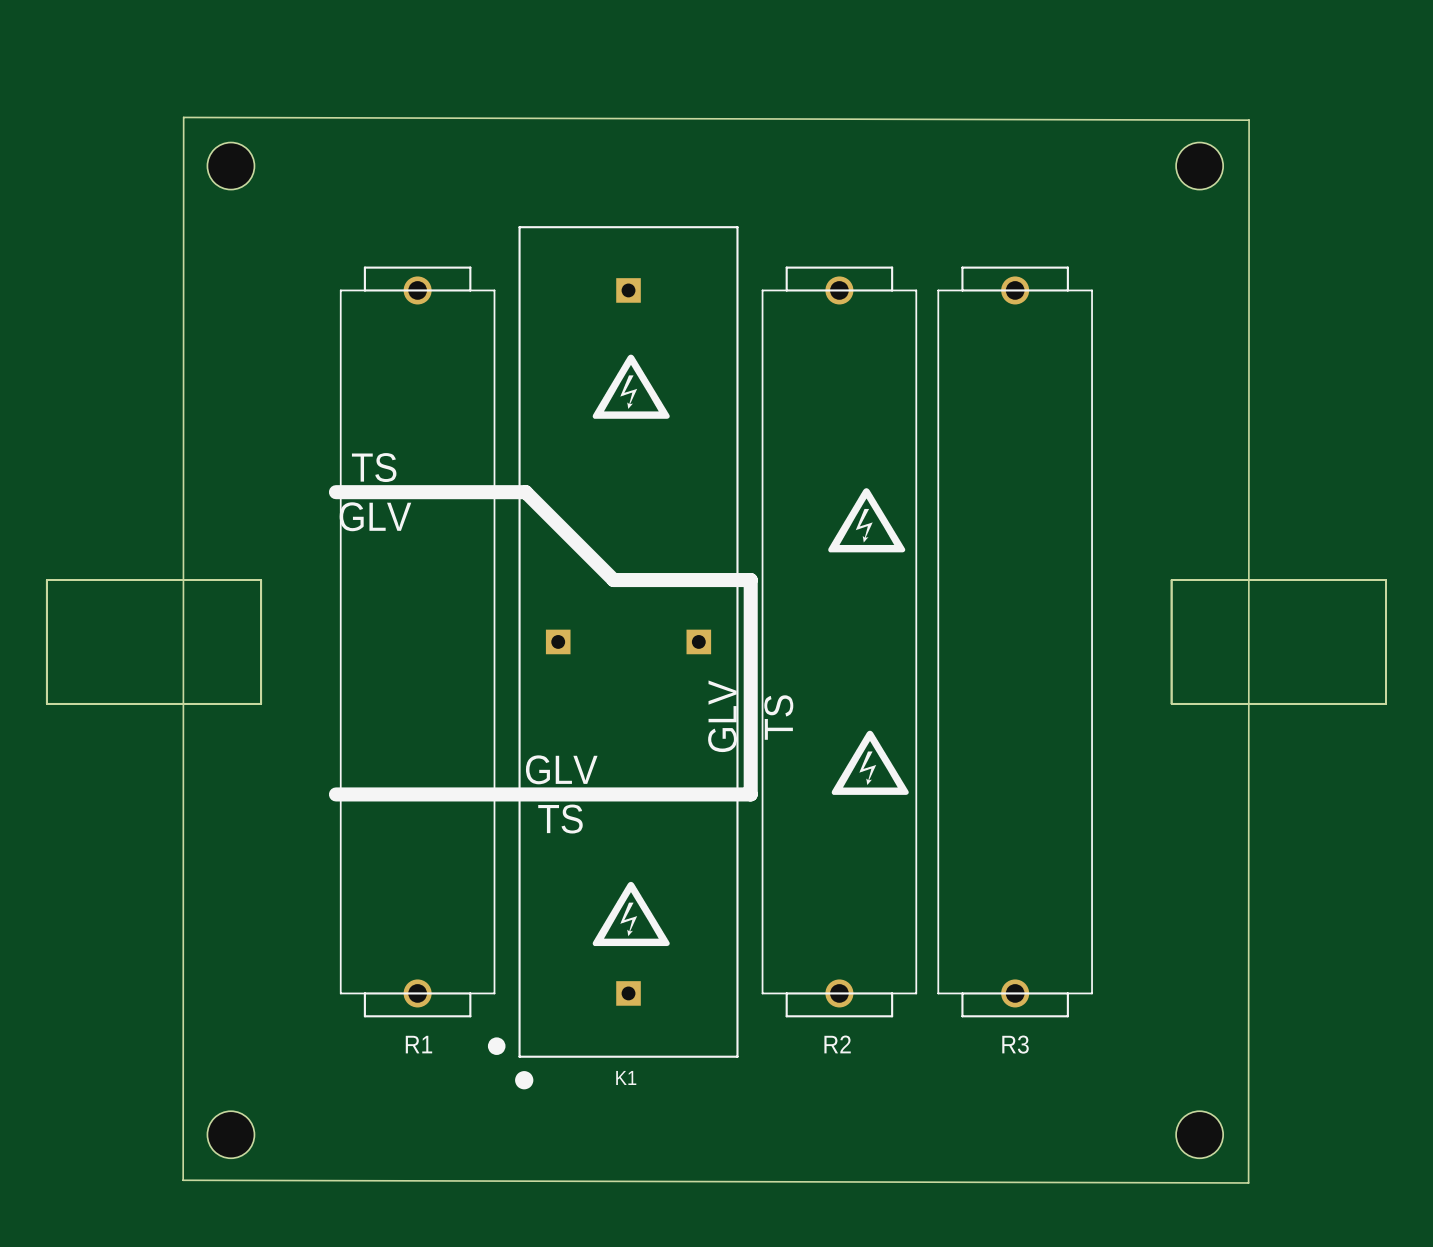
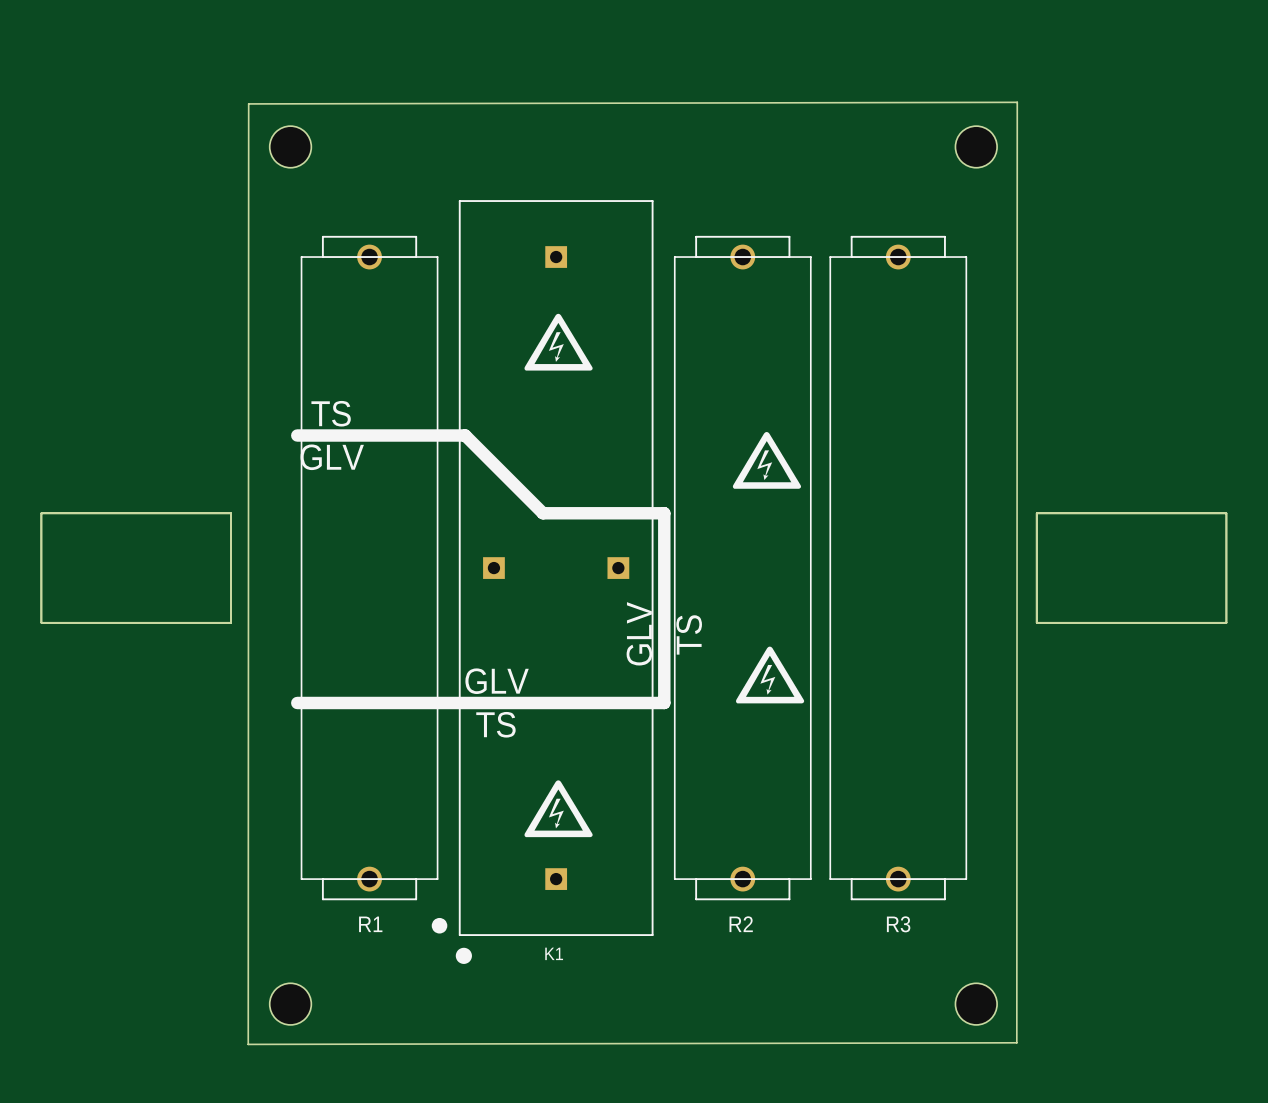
board edge: (183, 117) (1249, 120) (1248, 1182) (183, 1180) (183, 117) -> (1017, 102) (248, 103) (248, 1044) (1016, 1042) (1017, 102)
part position: (230, 166) -> (290, 146)
part position: (1199, 166) -> (976, 146)
part position: (230, 1134) -> (290, 1004)
part position: (1199, 1134) -> (976, 1004)

